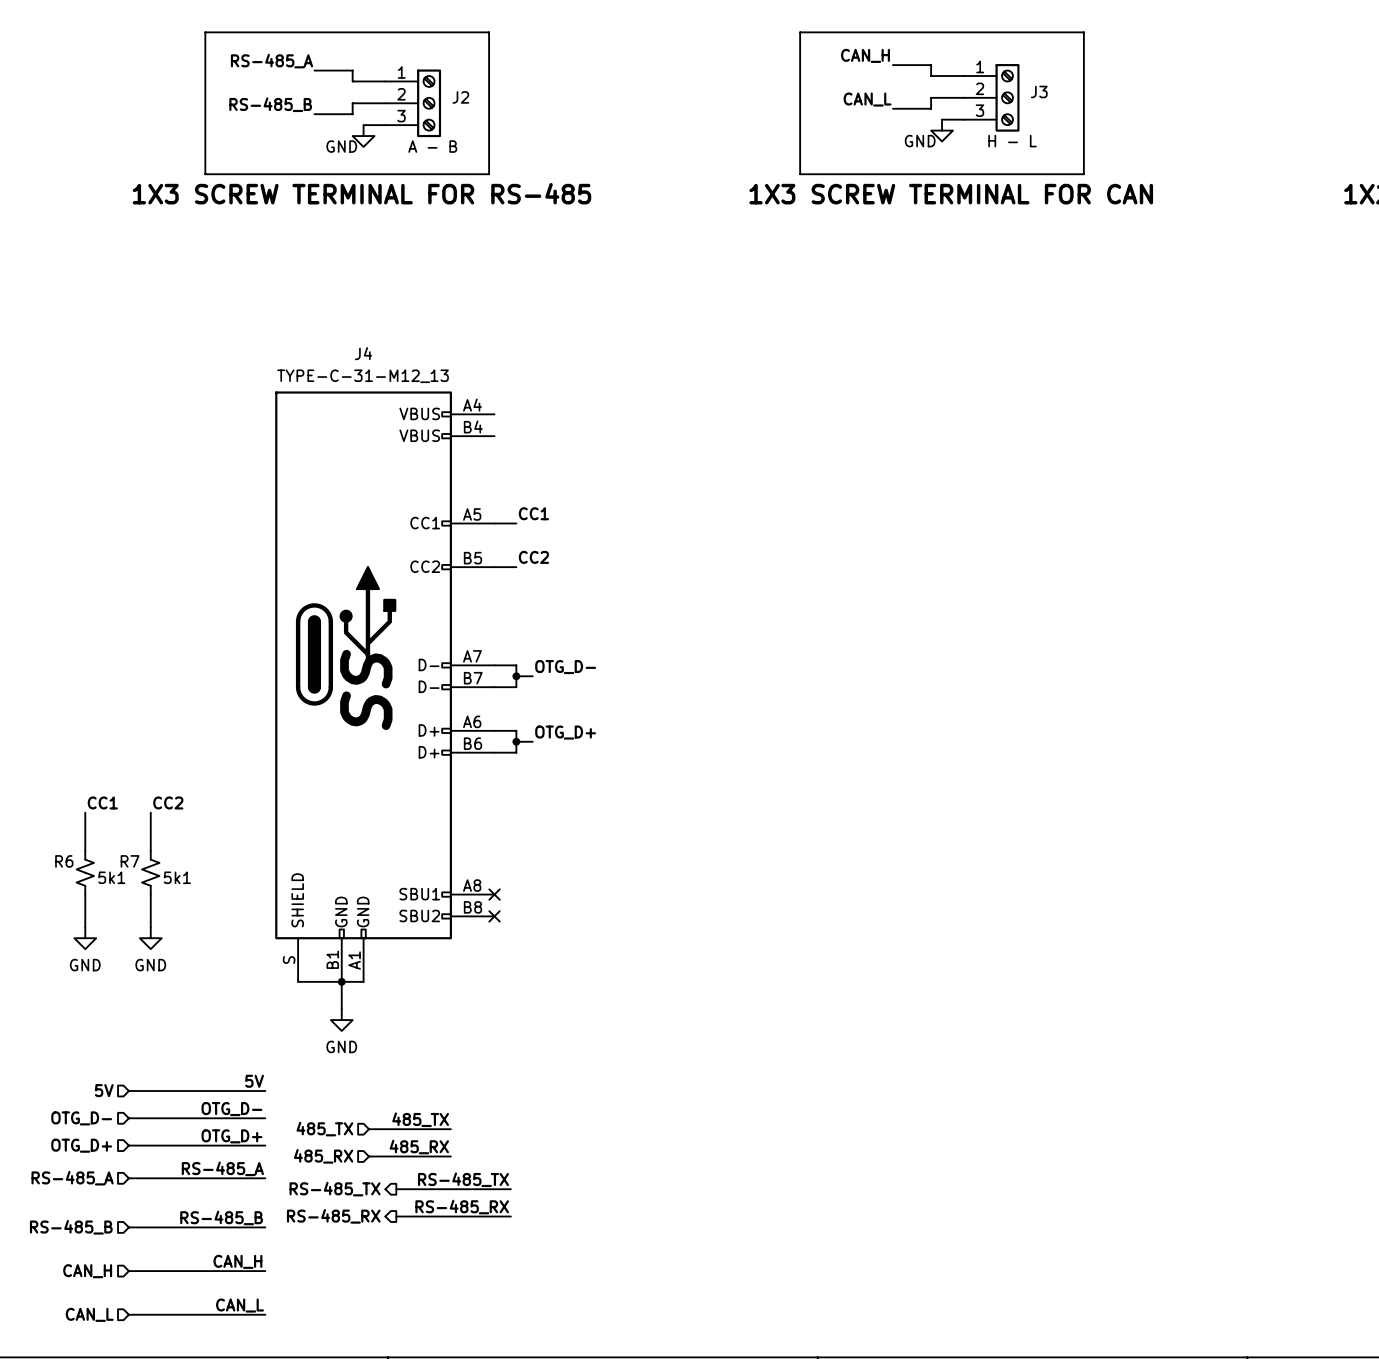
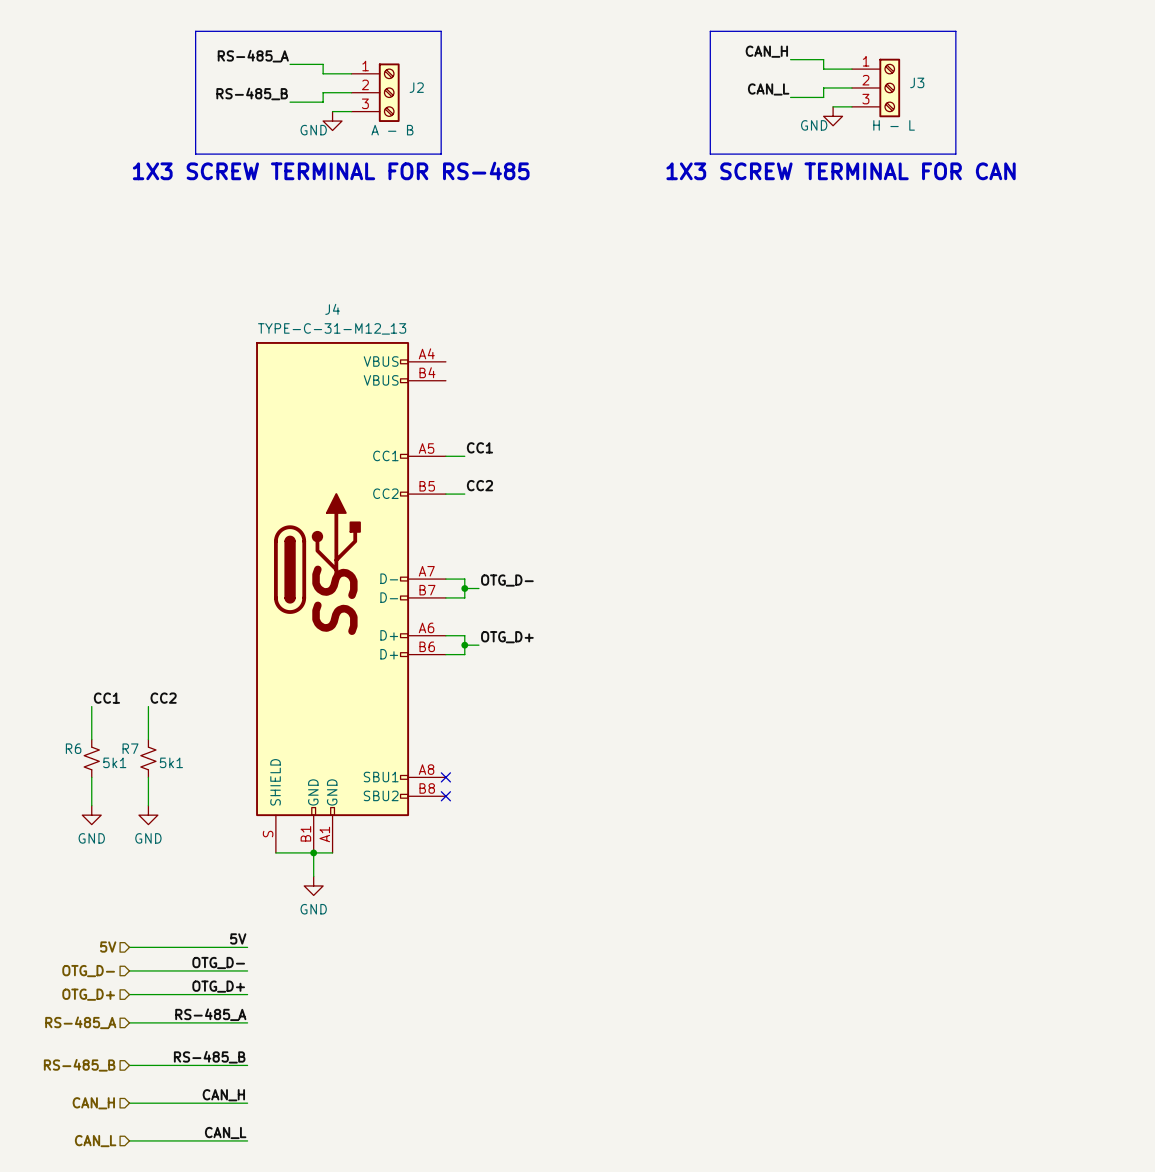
label: 485_TX (420, 1119) -> none
hierarchical label: 485_TX (324, 1129) -> none
wire: (369, 1129) (450, 1129) -> none
label: 485_RX (419, 1147) -> none
hierarchical label: 485_RX (323, 1156) -> none
wire: (369, 1156) (450, 1156) -> none
label: RS-485_TX (463, 1179) -> none
hierarchical label: RS-485_TX (335, 1189) -> none
wire: (396, 1189) (510, 1189) -> none
label: RS-485_RX (462, 1207) -> none
hierarchical label: RS-485_RX (333, 1216) -> none
wire: (396, 1216) (510, 1216) -> none

